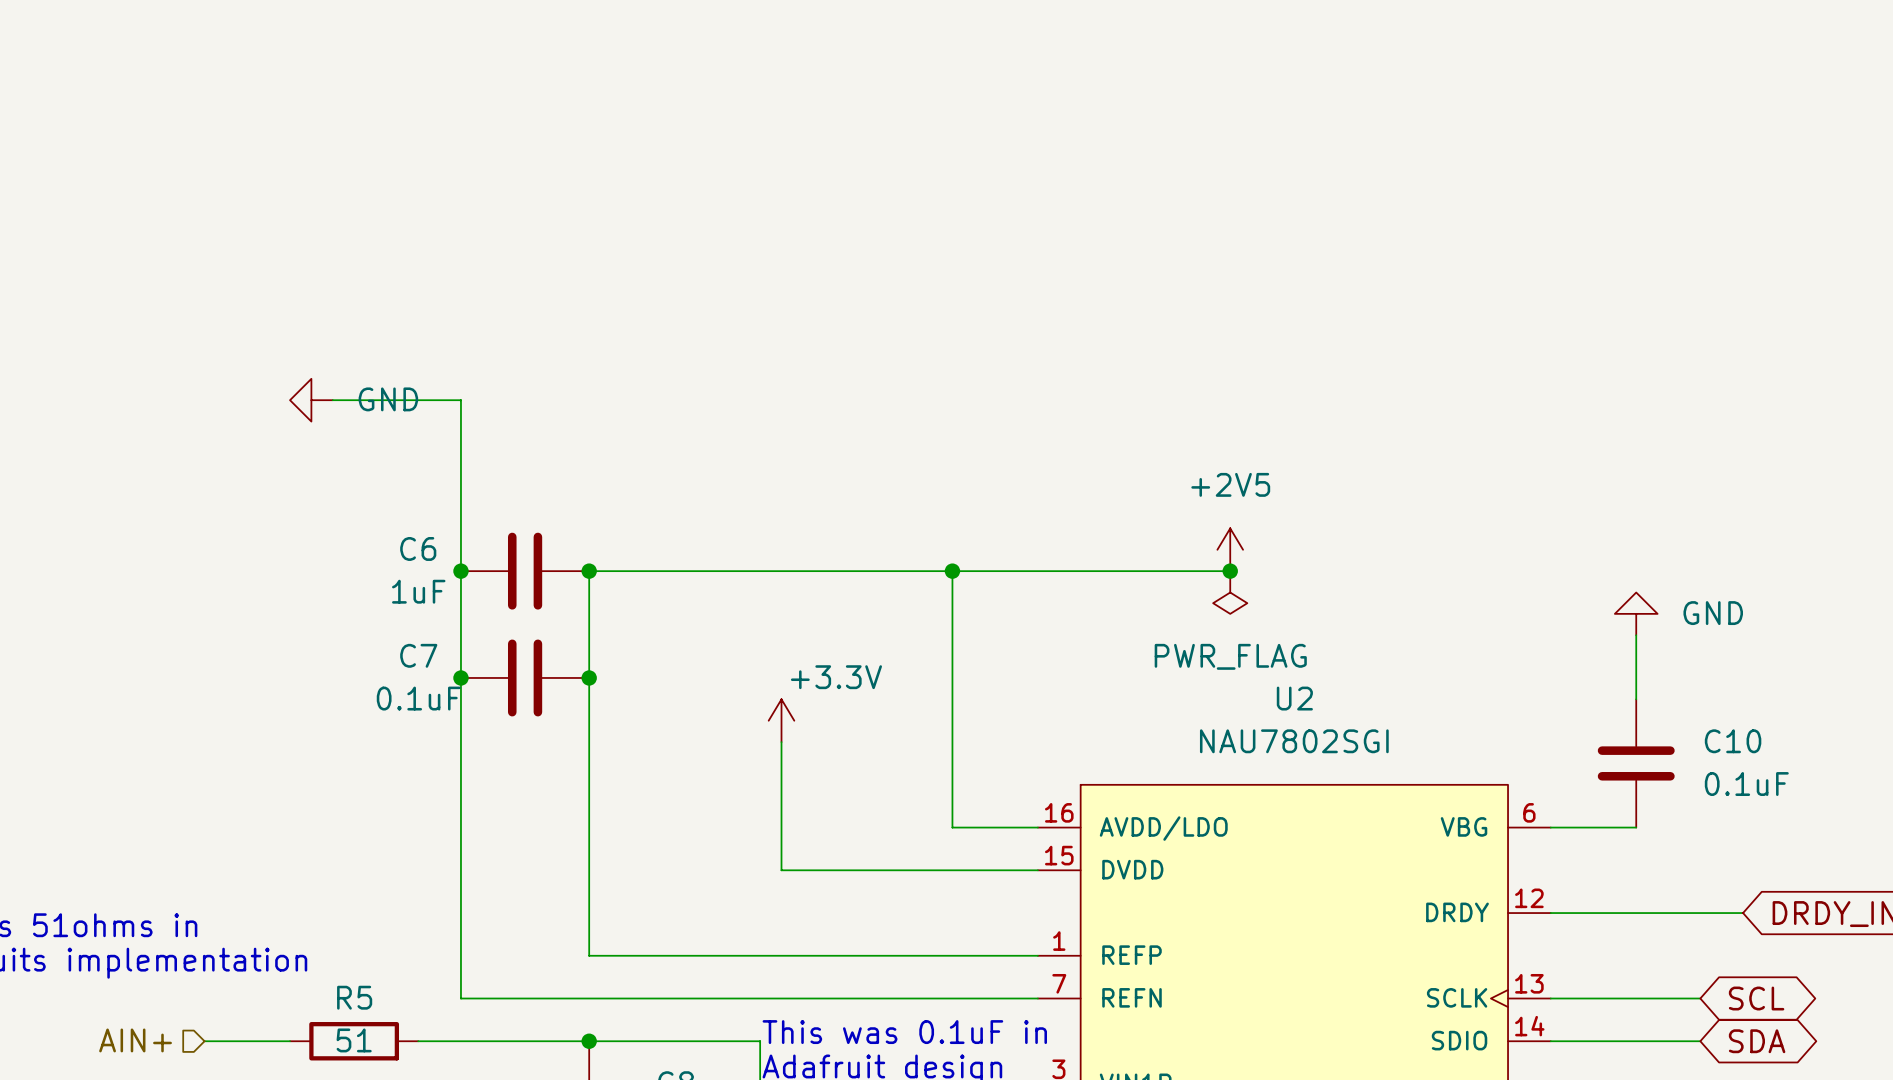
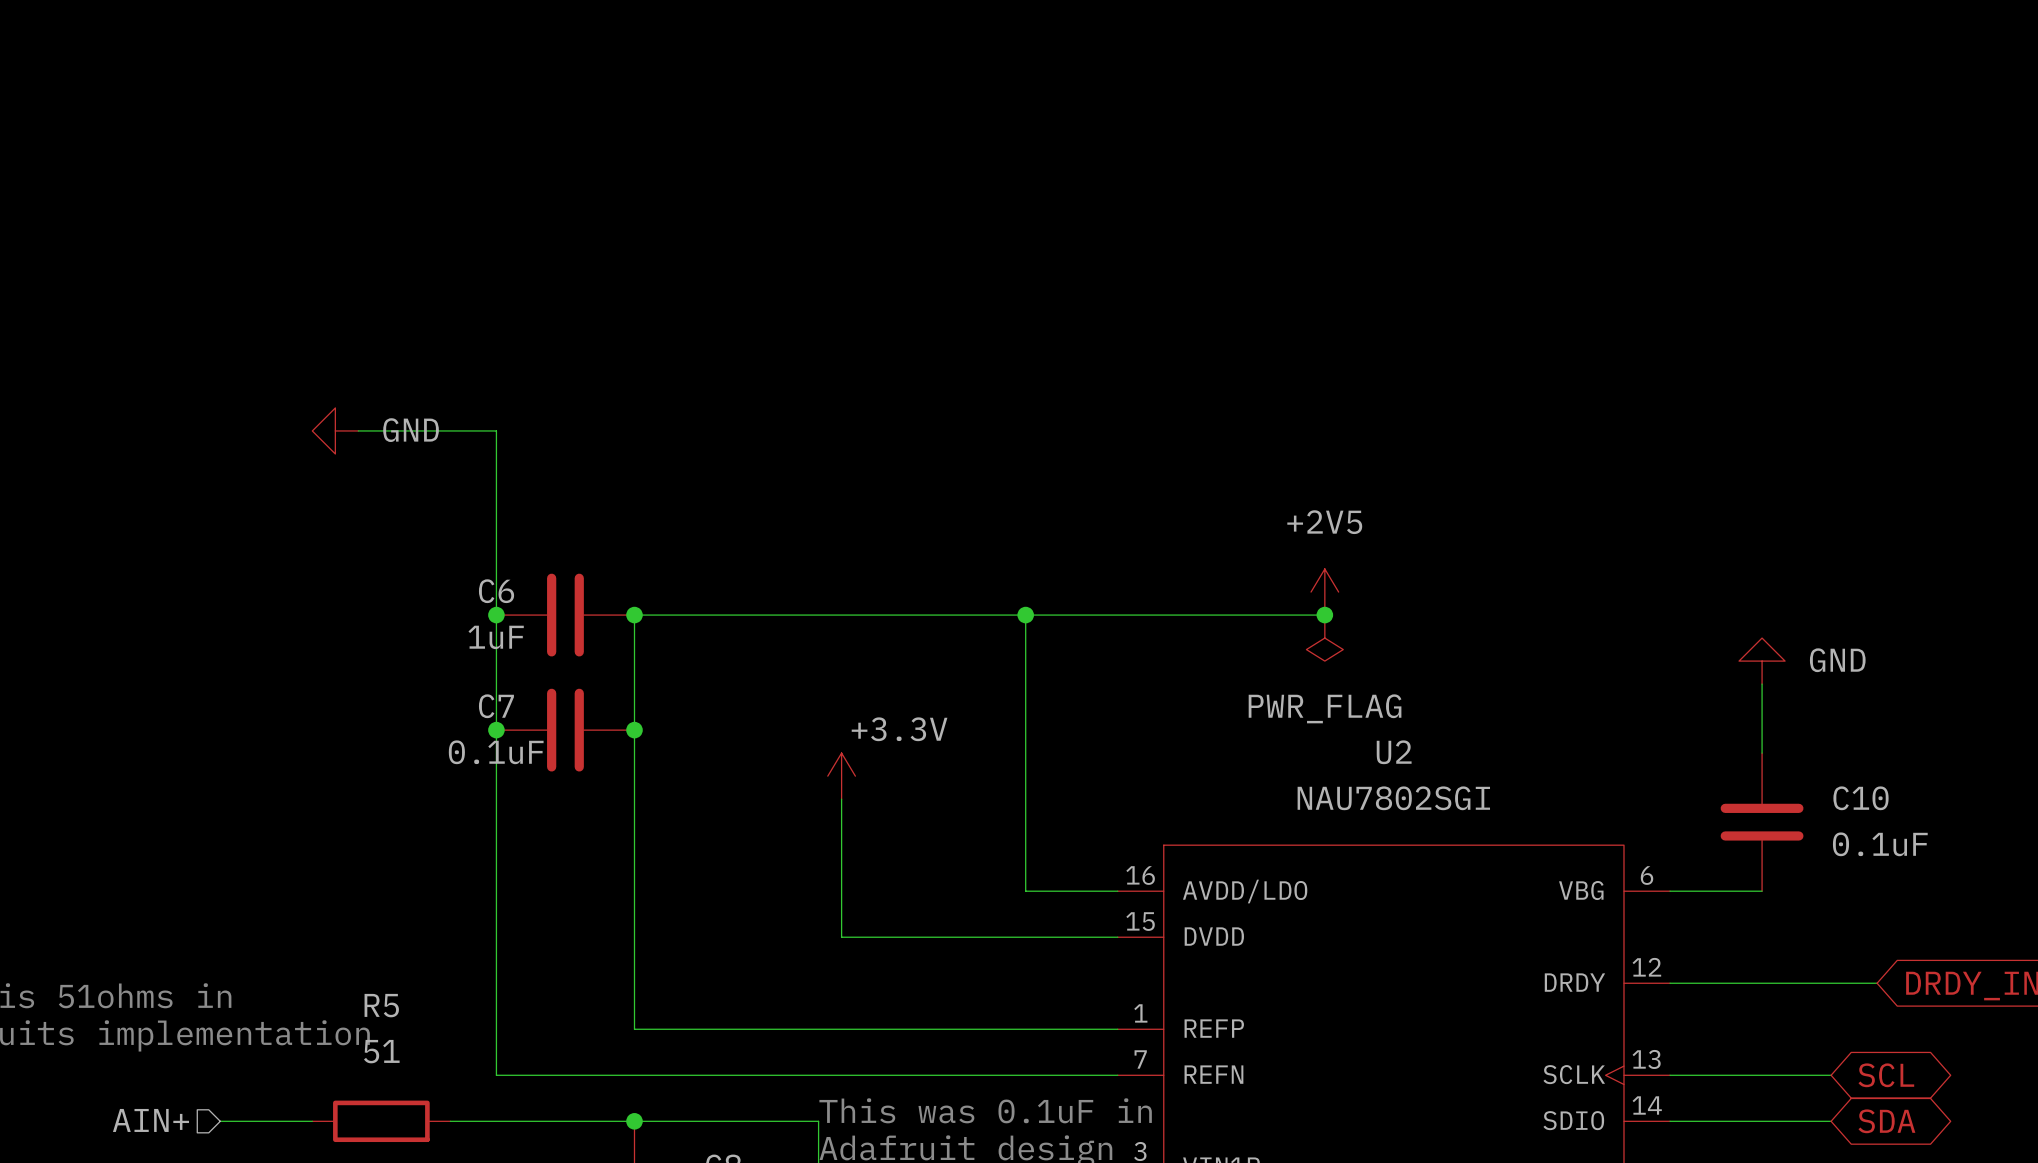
C6 name position: C6 (418, 548) -> C6 (496, 591)
C6 value position: 1uF (418, 591) -> 1uF (496, 637)
C7 name position: C7 (418, 655) -> C7 (496, 706)
C7 value position: 0.1uF (418, 698) -> 0.1uF (496, 752)
R5 name position: R5 (354, 997) -> R5 (381, 1005)
R5 value position: 51 (354, 1040) -> 51 (381, 1051)

